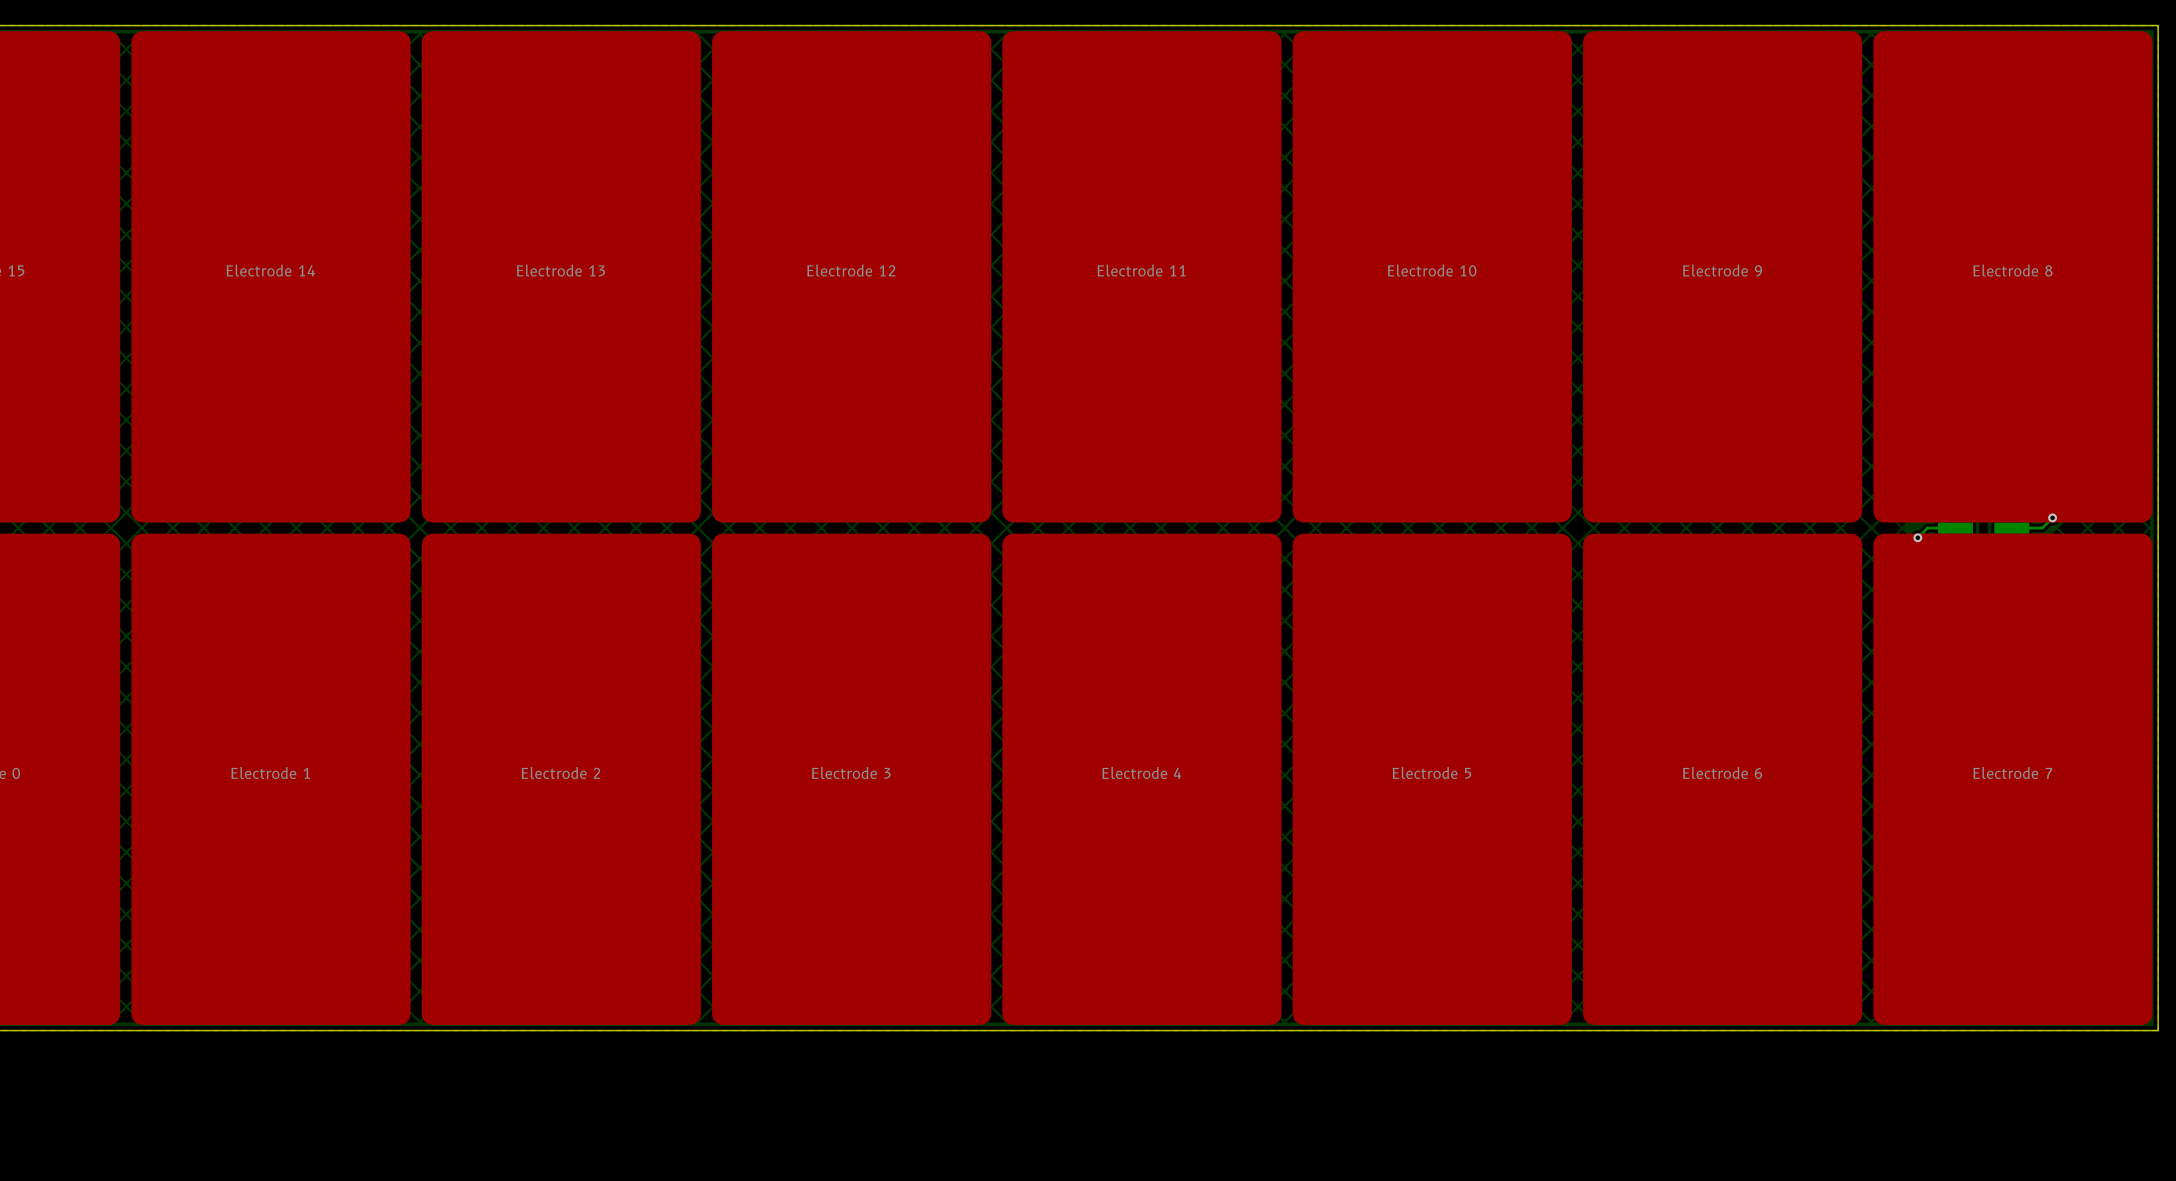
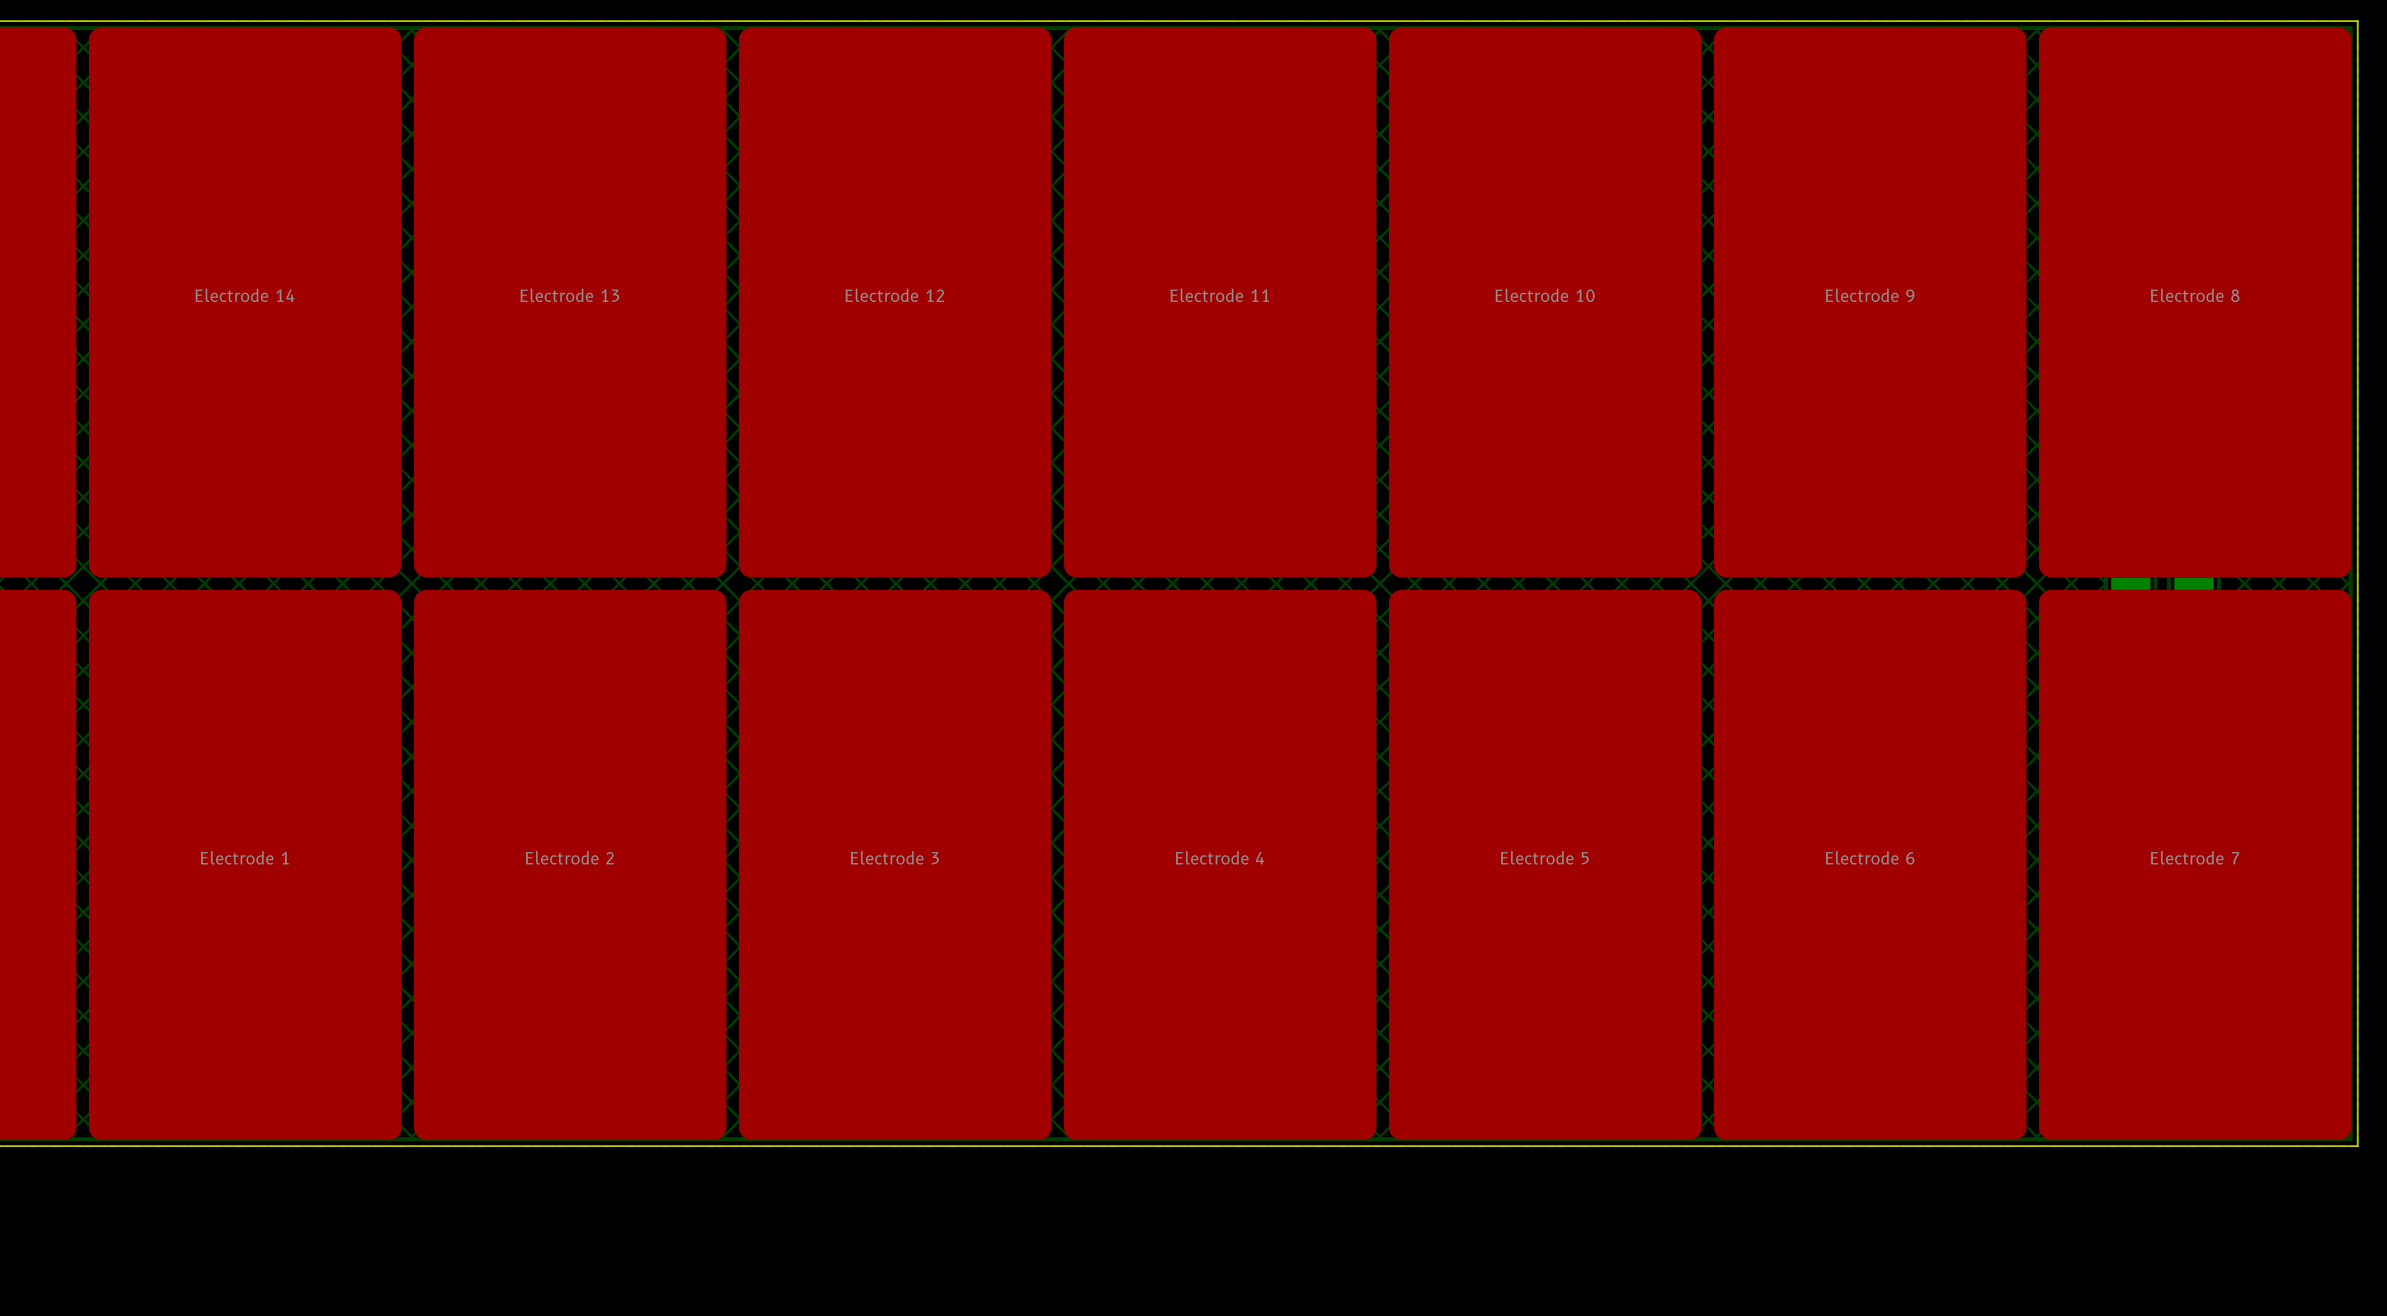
bottom track: (2052, 517) (2042, 528) (2011, 528) -> none
via: (2052, 517) -> none
bottom track: (1955, 528) (1927, 528) (1917, 537) -> none
via: (1917, 537) -> none

